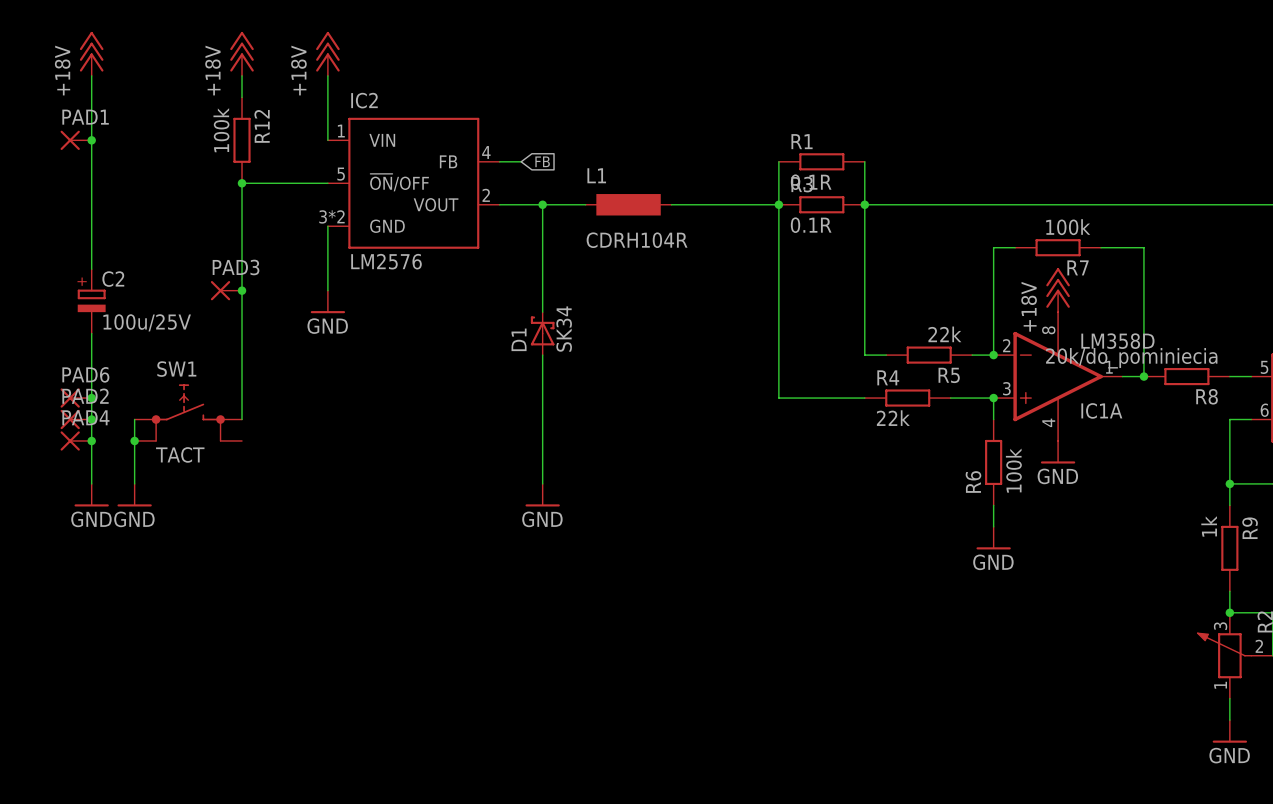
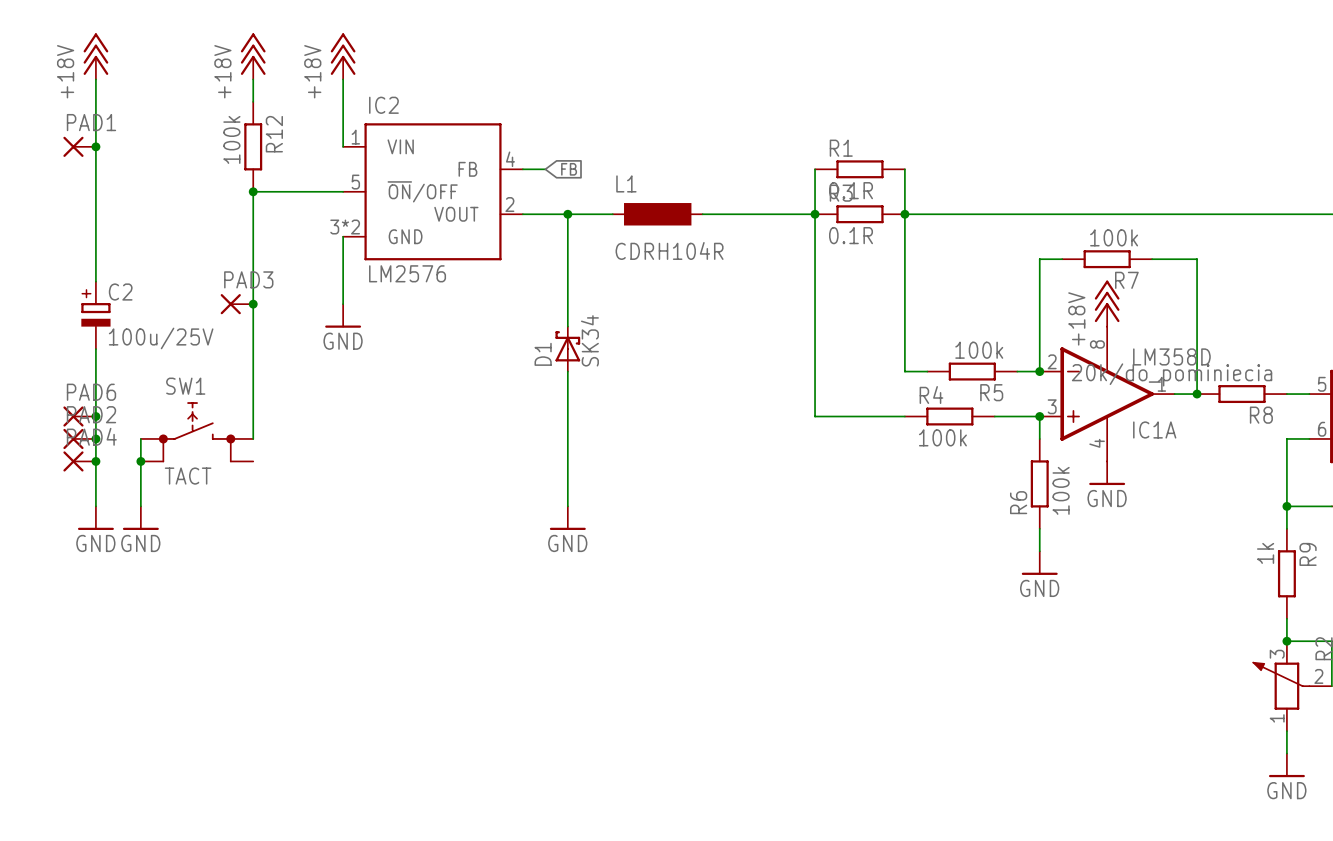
R5 value: 22k (944, 334) -> 100k (979, 350)
R4 value: 22k (893, 418) -> 100k (942, 437)

